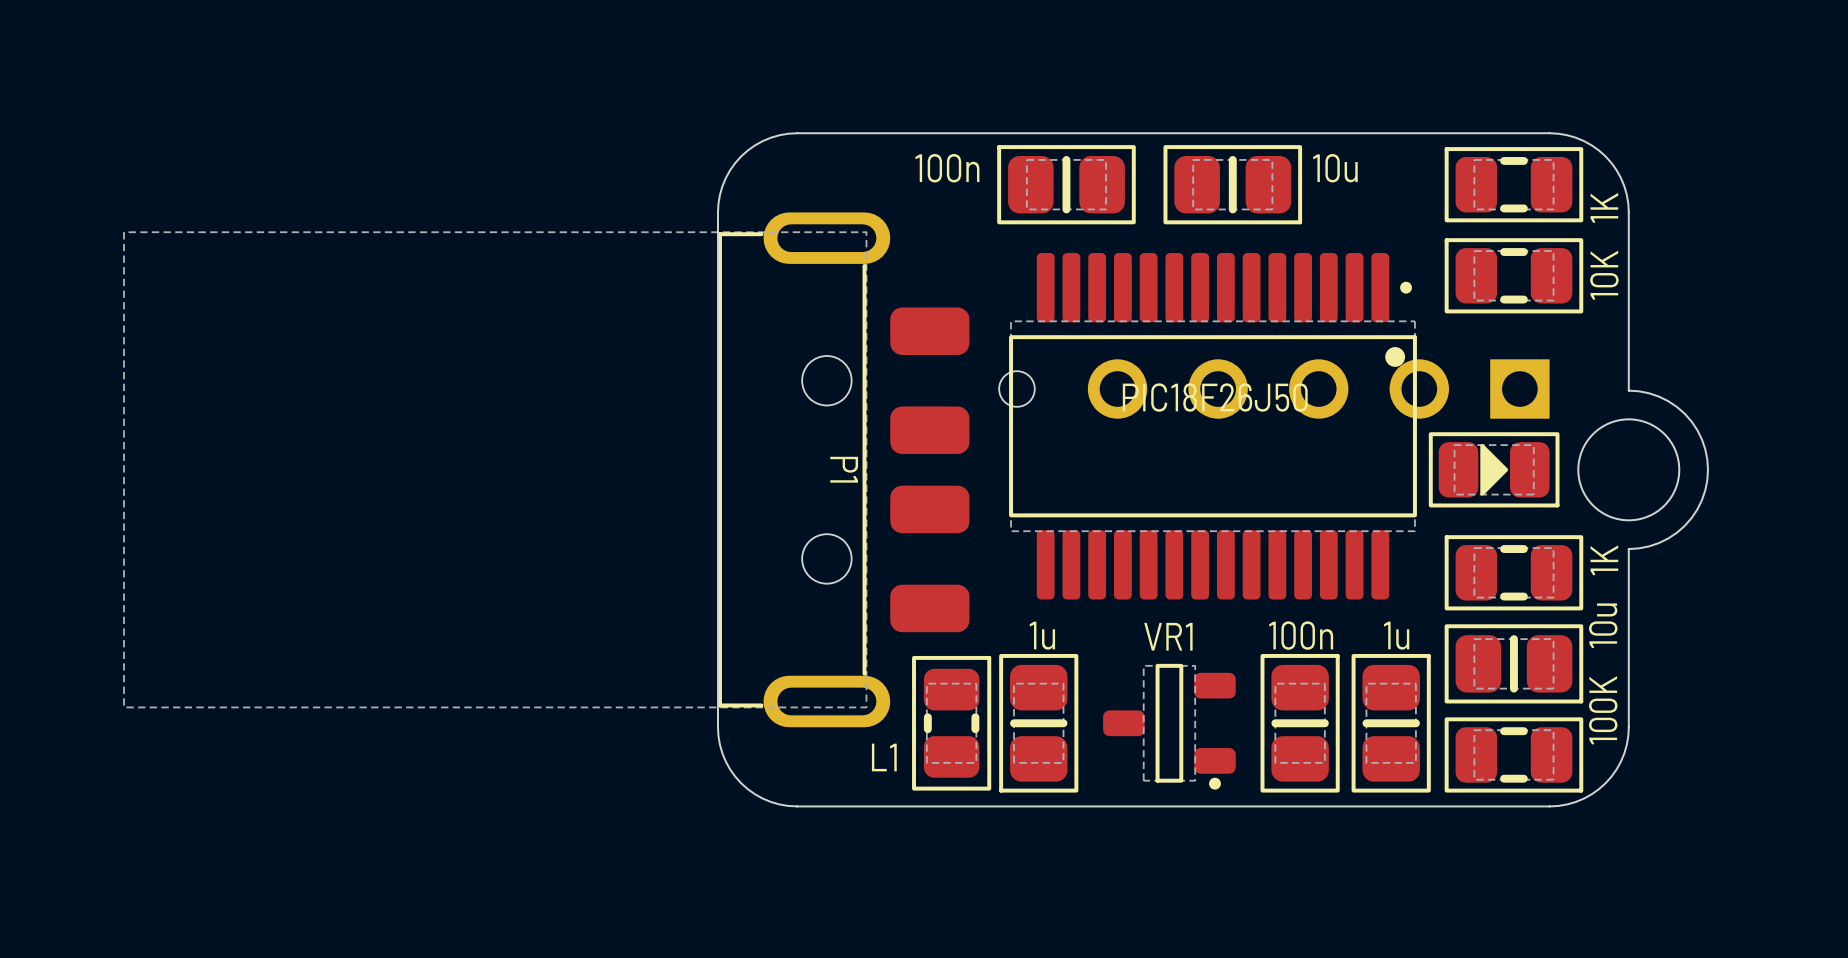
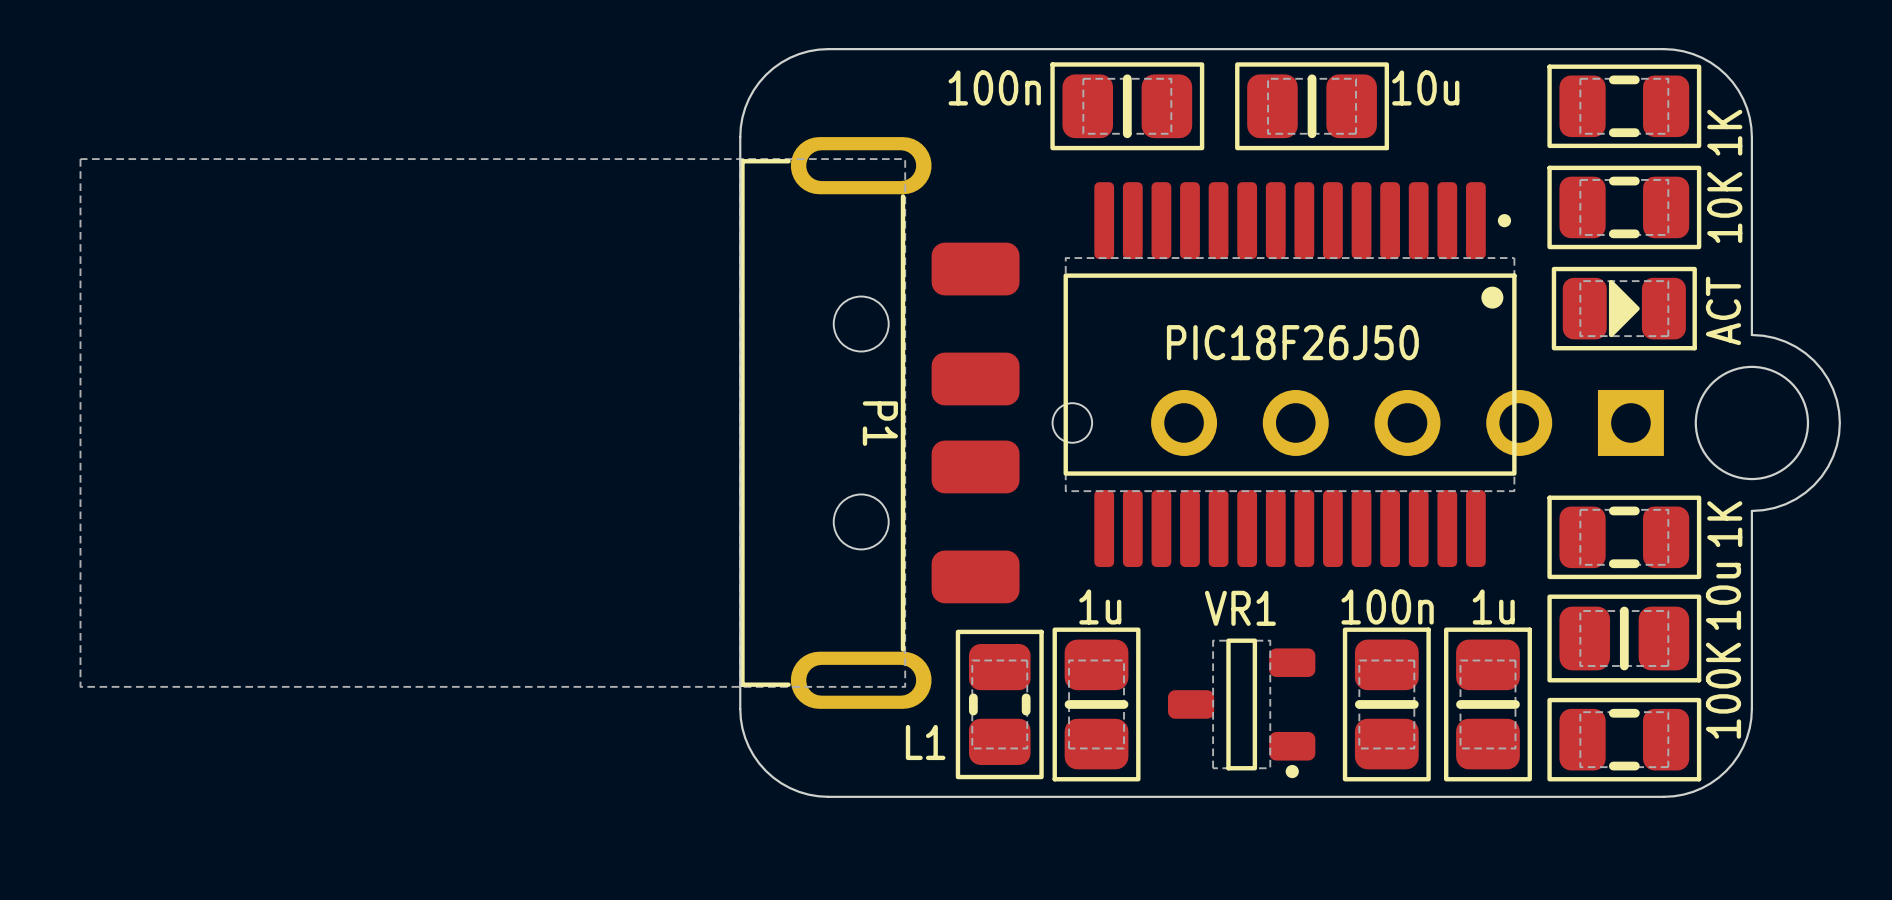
part: none -> ACT (1624, 308)
part position: (1274, 389) -> (1358, 422)
part: (1494, 469) -> none

